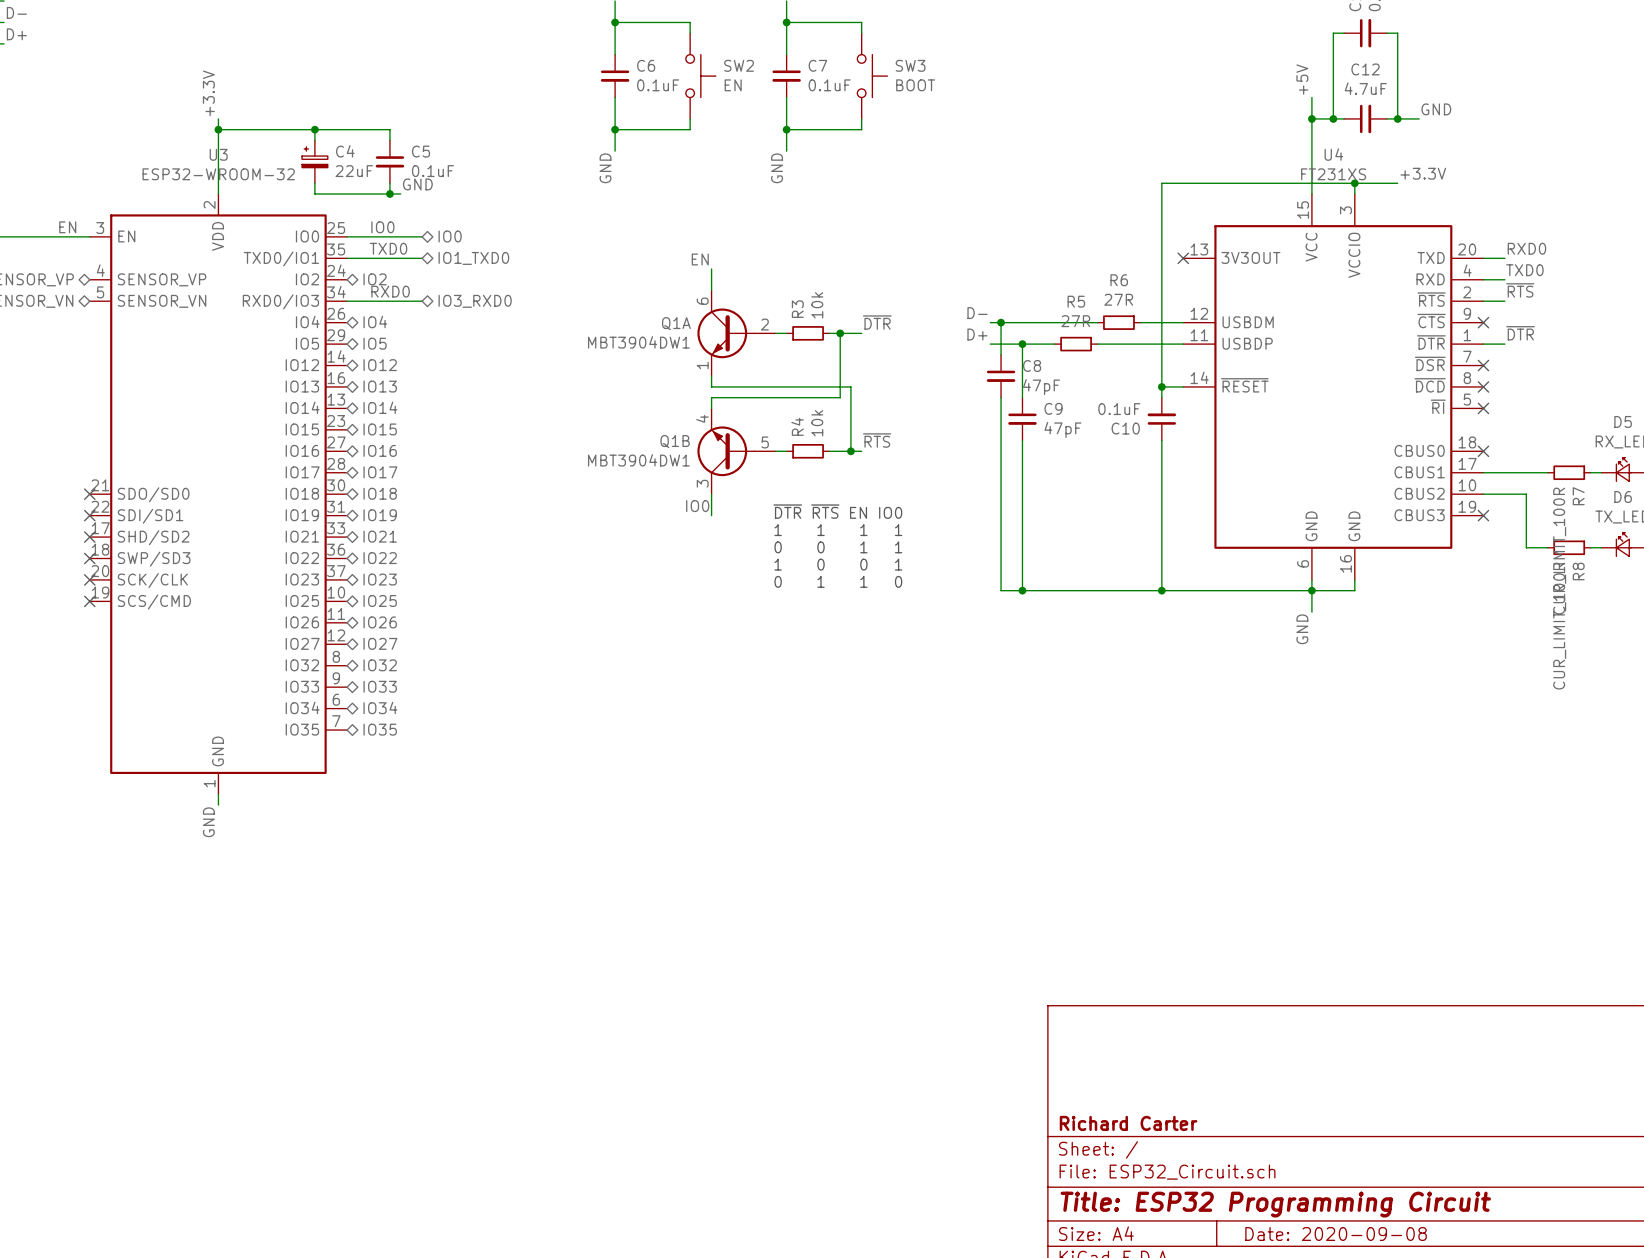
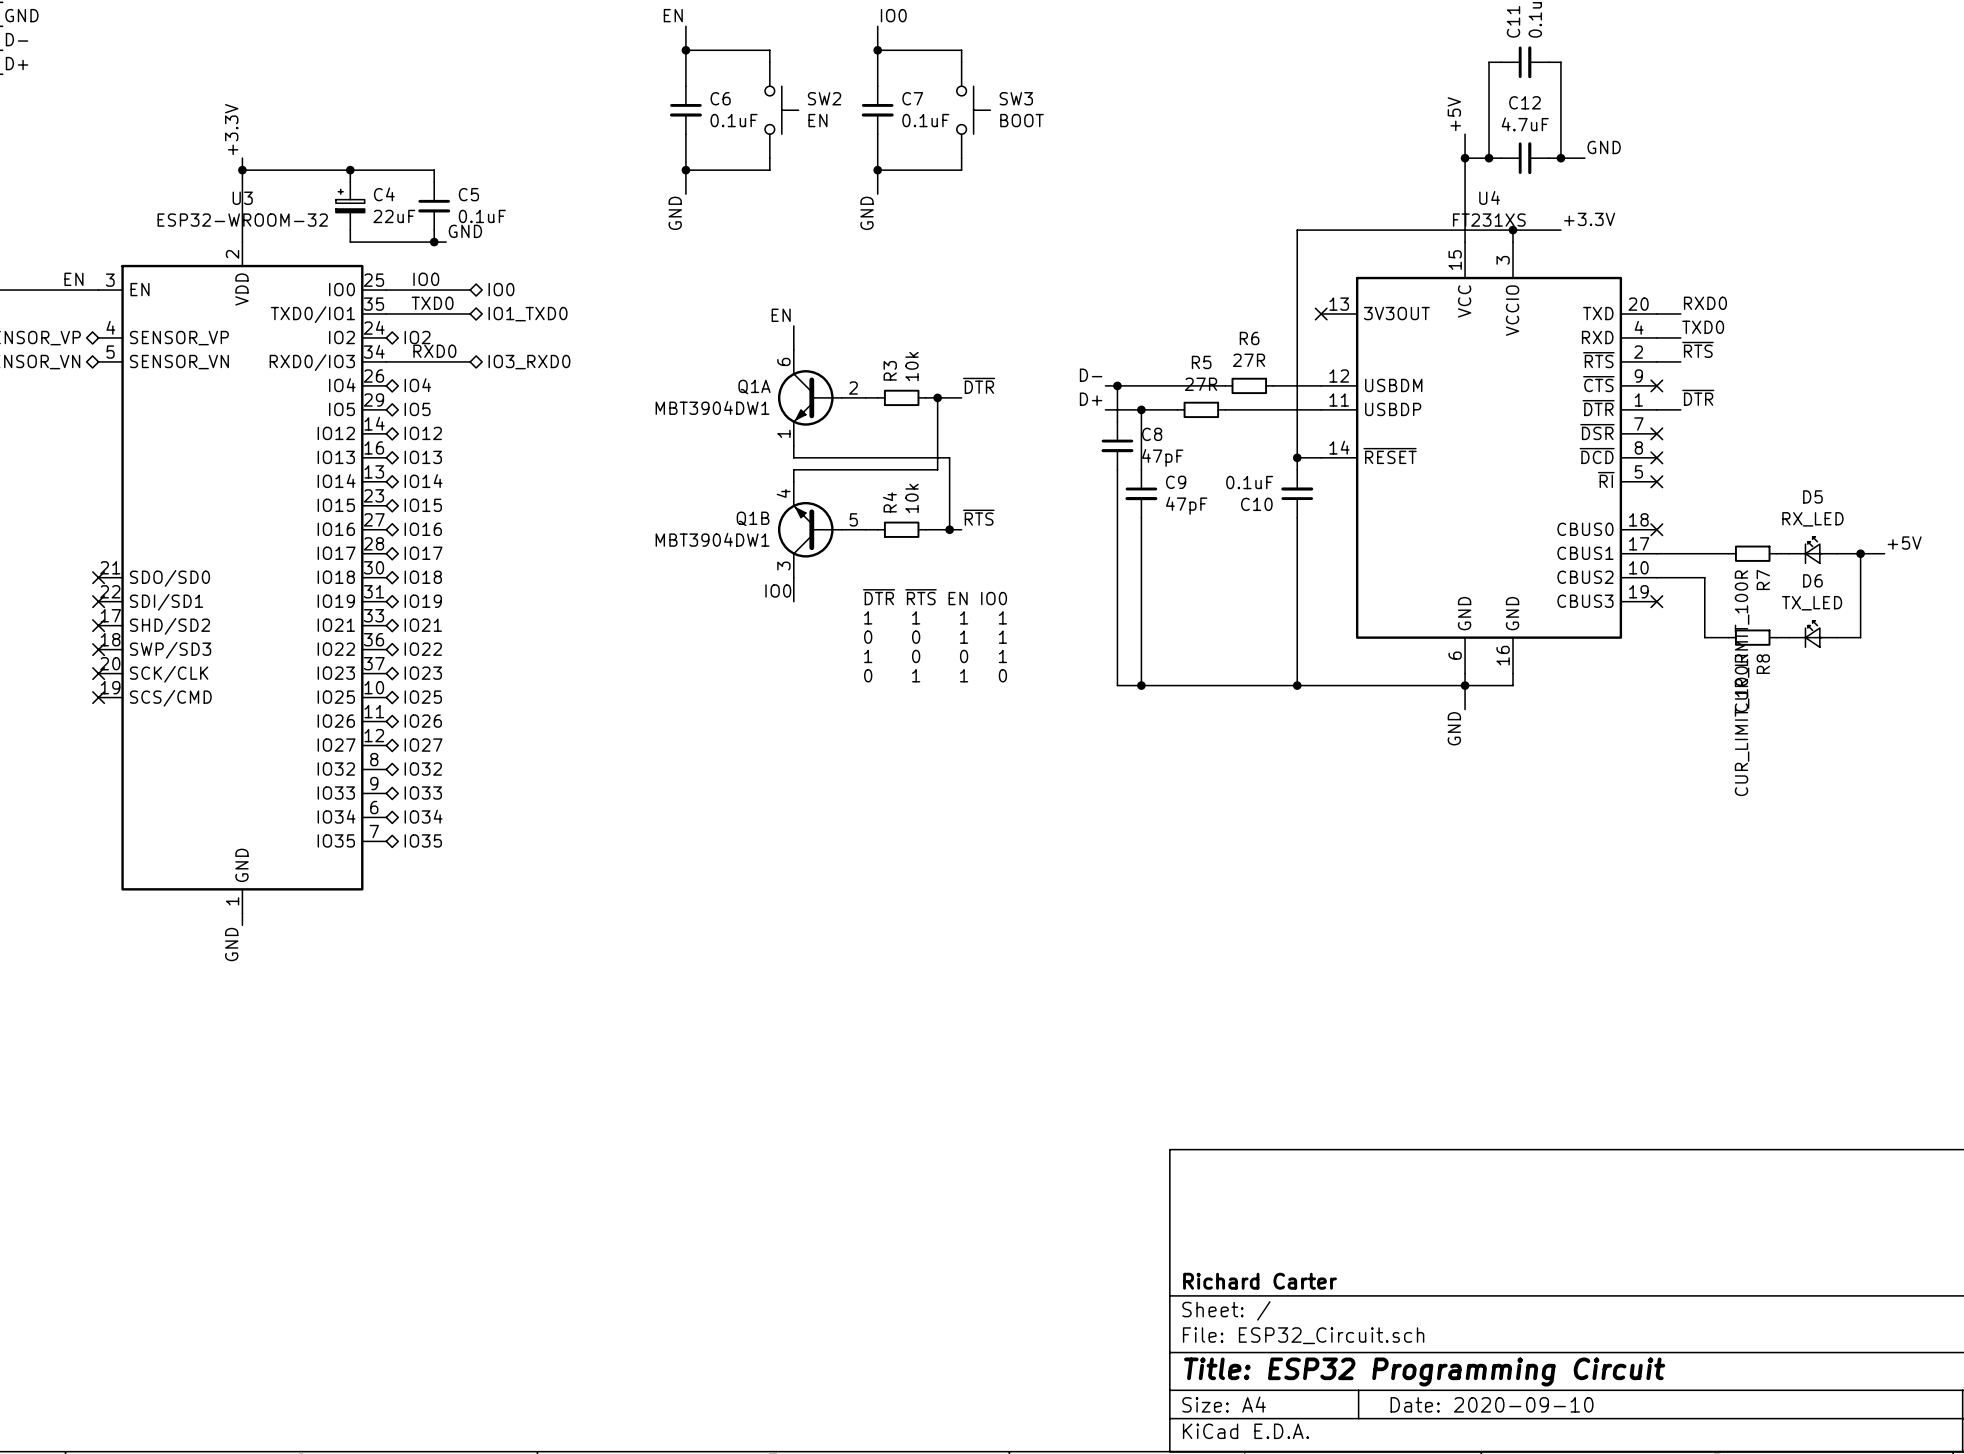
title block: Date: 2020-09-08 (1336, 1233) -> Date: 2020-09-10 (1492, 1404)

